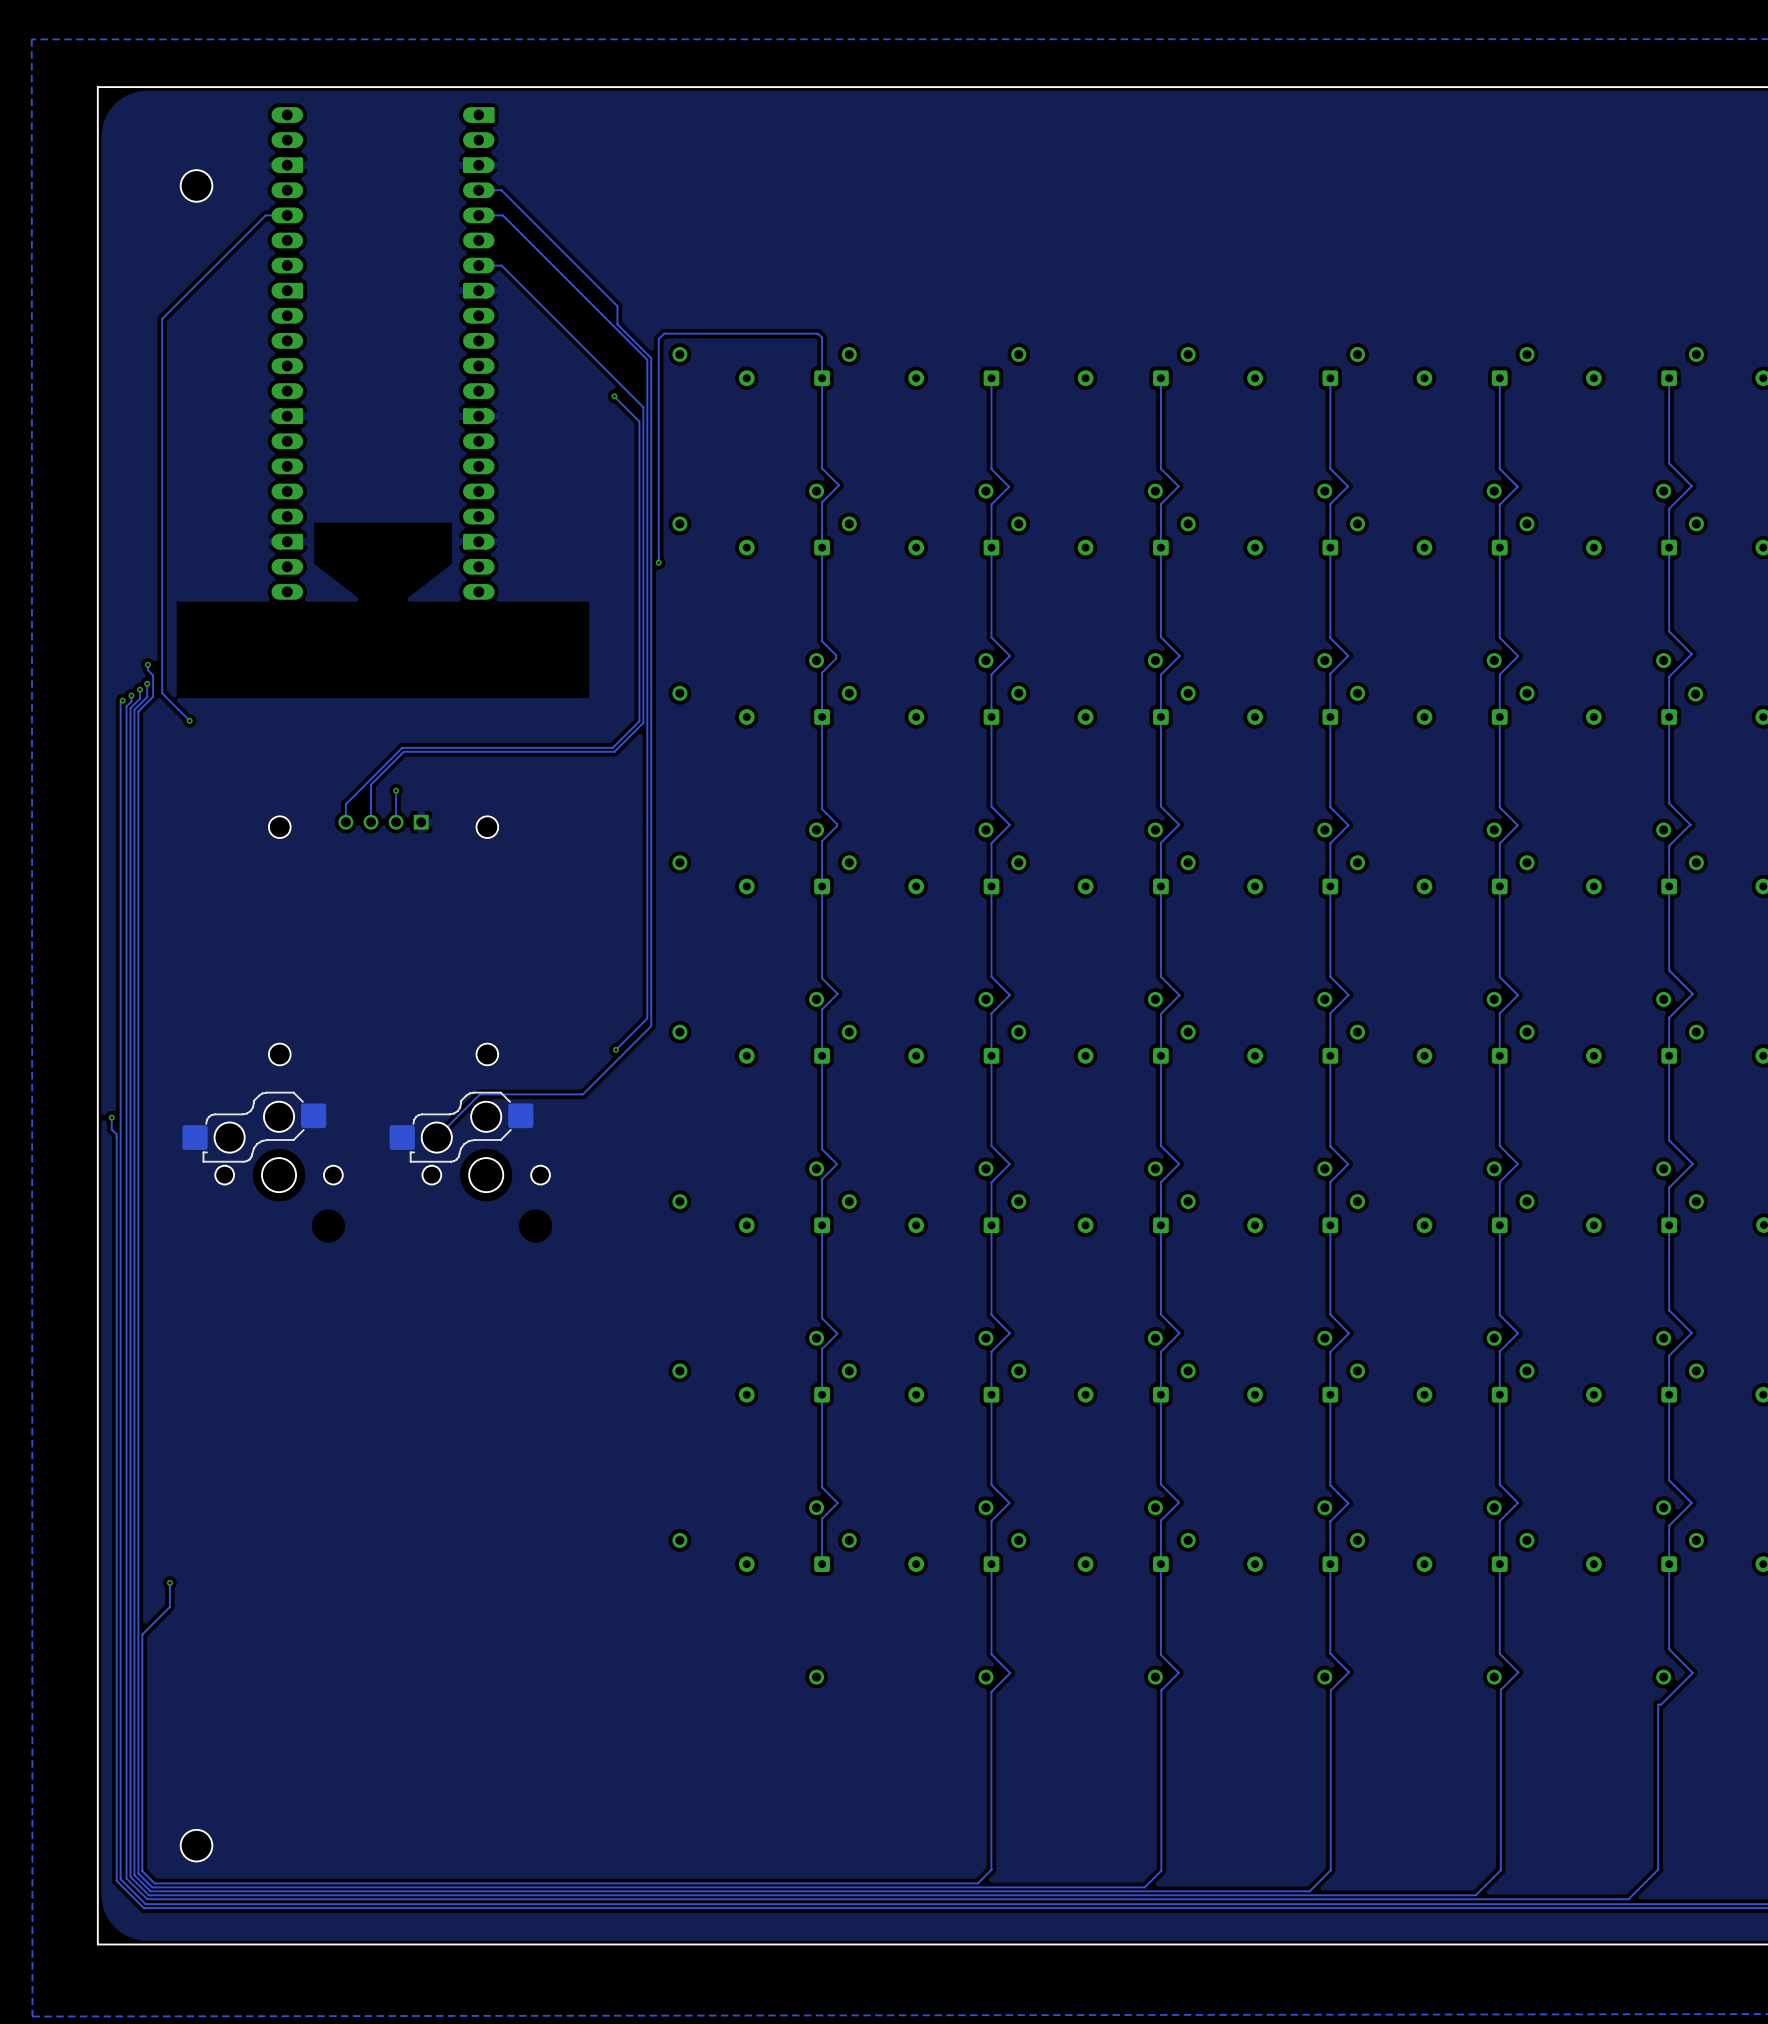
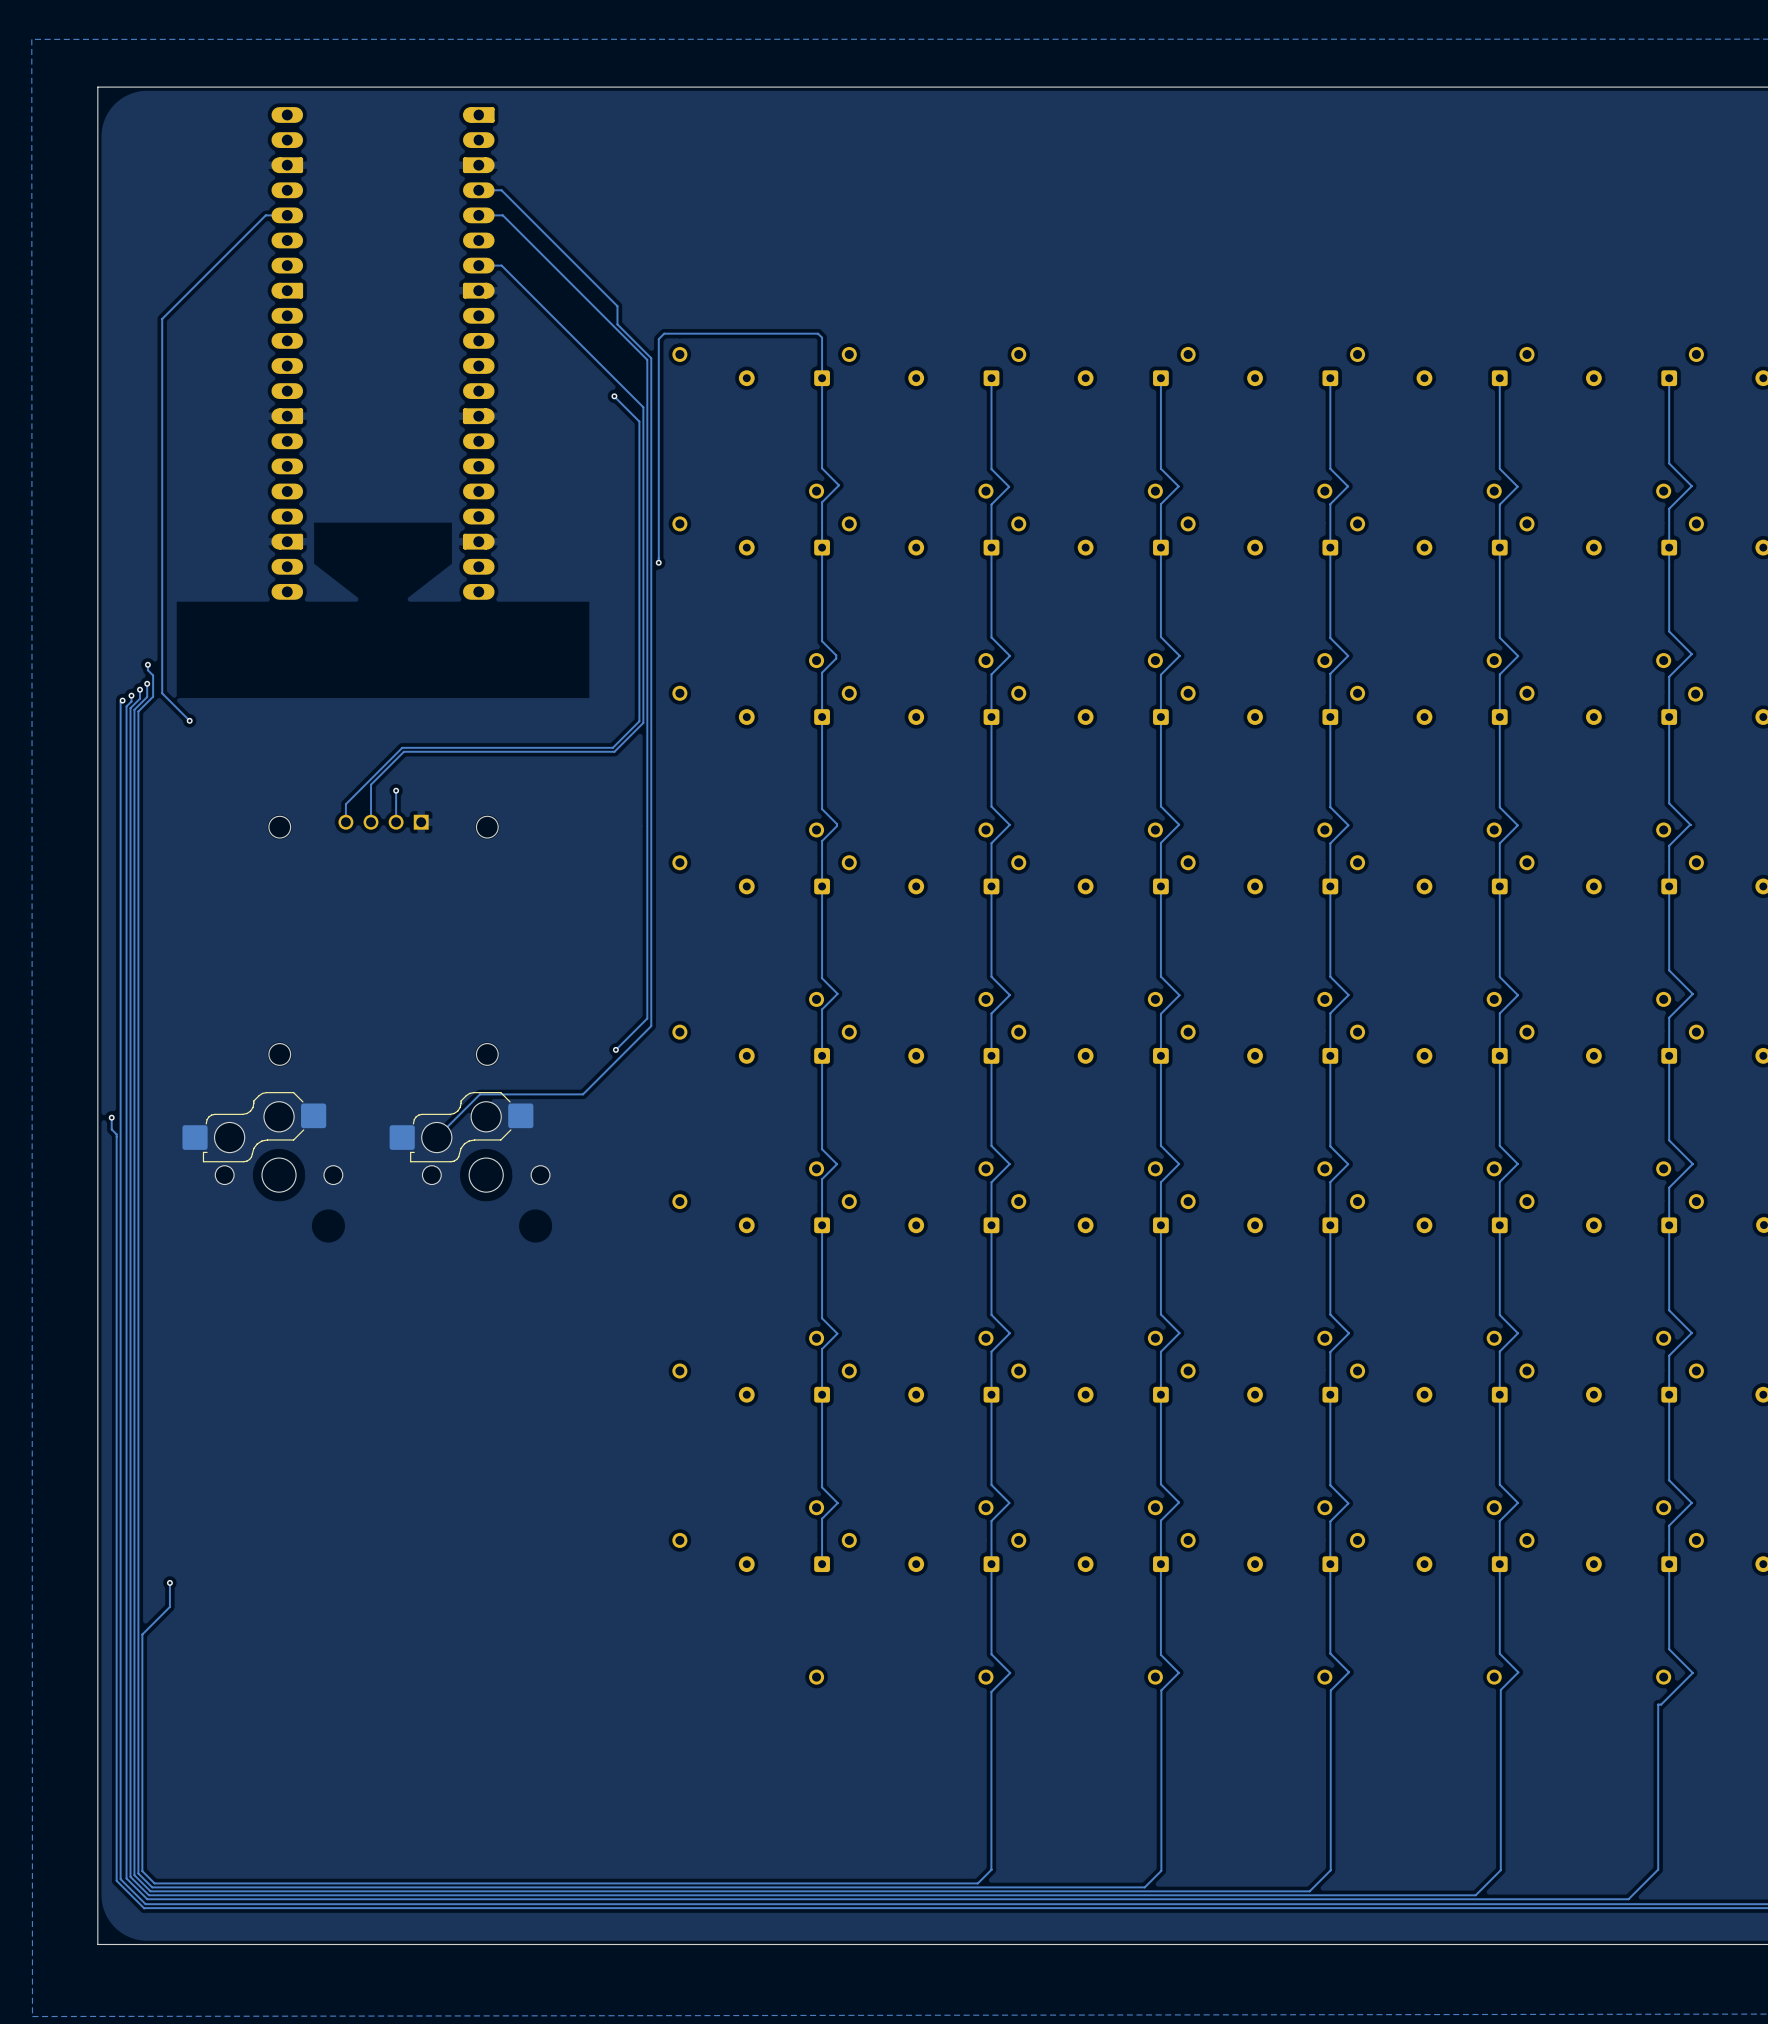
part: (196, 185) -> none
part: (196, 1845) -> none

